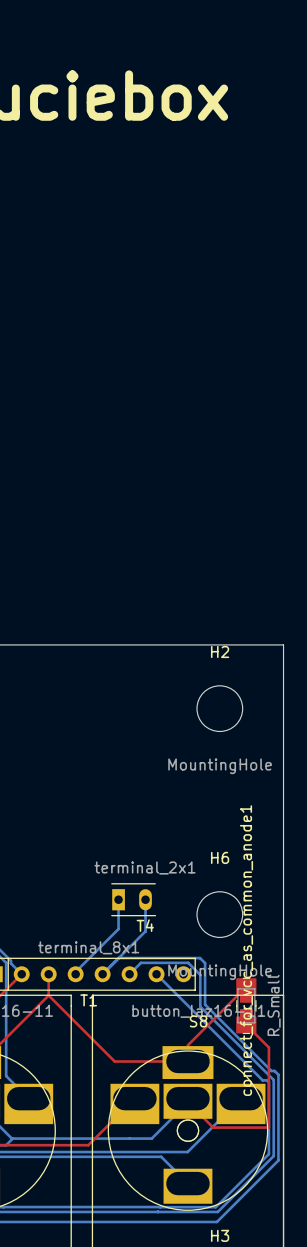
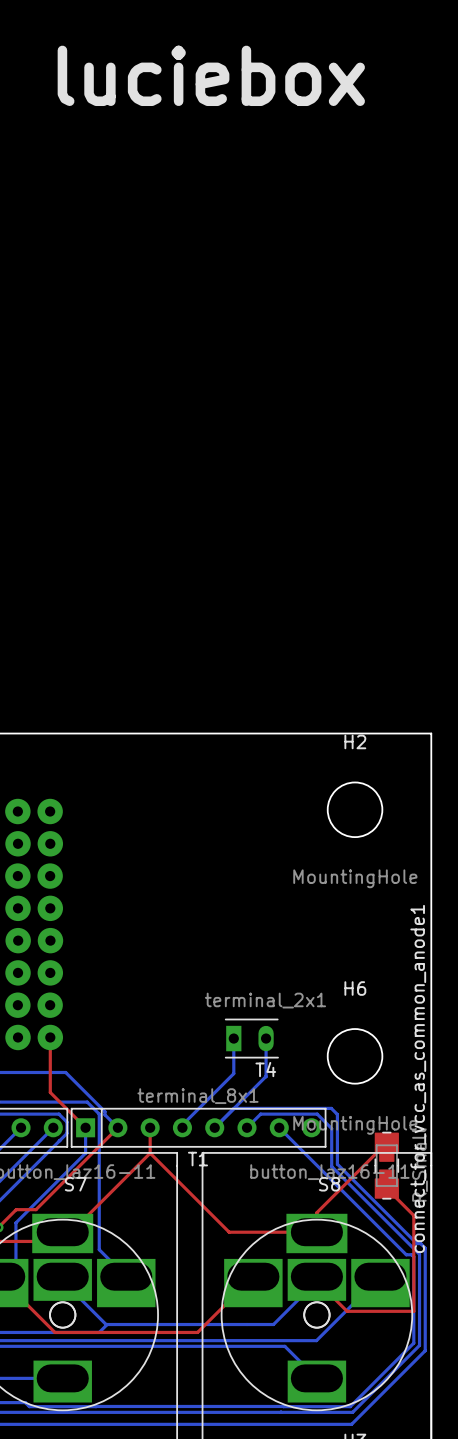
connect_for_vcc_as_common_anode1 name position: connect_for_vcc_as_common_anode1 (246, 950) -> connect_for_vcc_as_common_anode1 (418, 1078)

